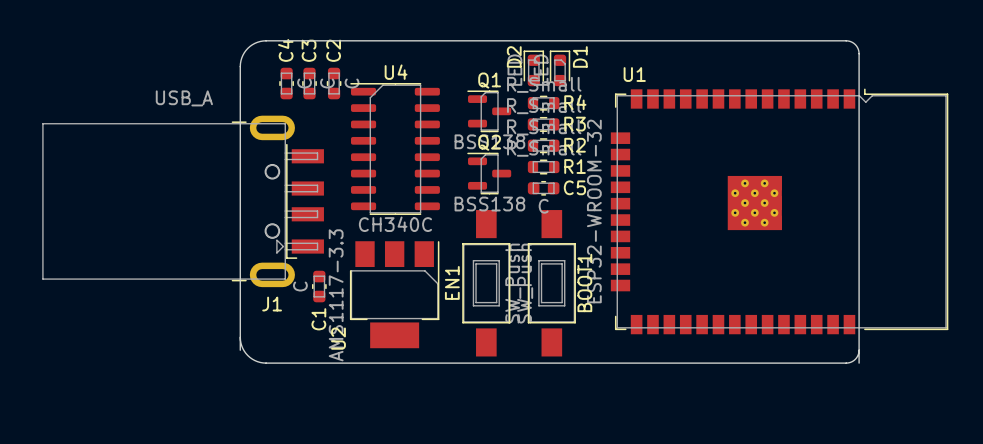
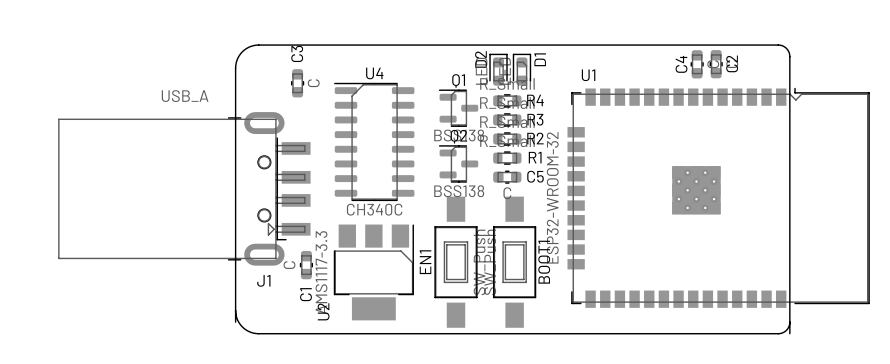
C4 name position: C4 (285, 50) -> C4 (681, 64)
C2 name position: C2 (333, 50) -> C2 (732, 63)
C4 position: (286, 83) -> (697, 64)
C2 position: (334, 83) -> (716, 64)

